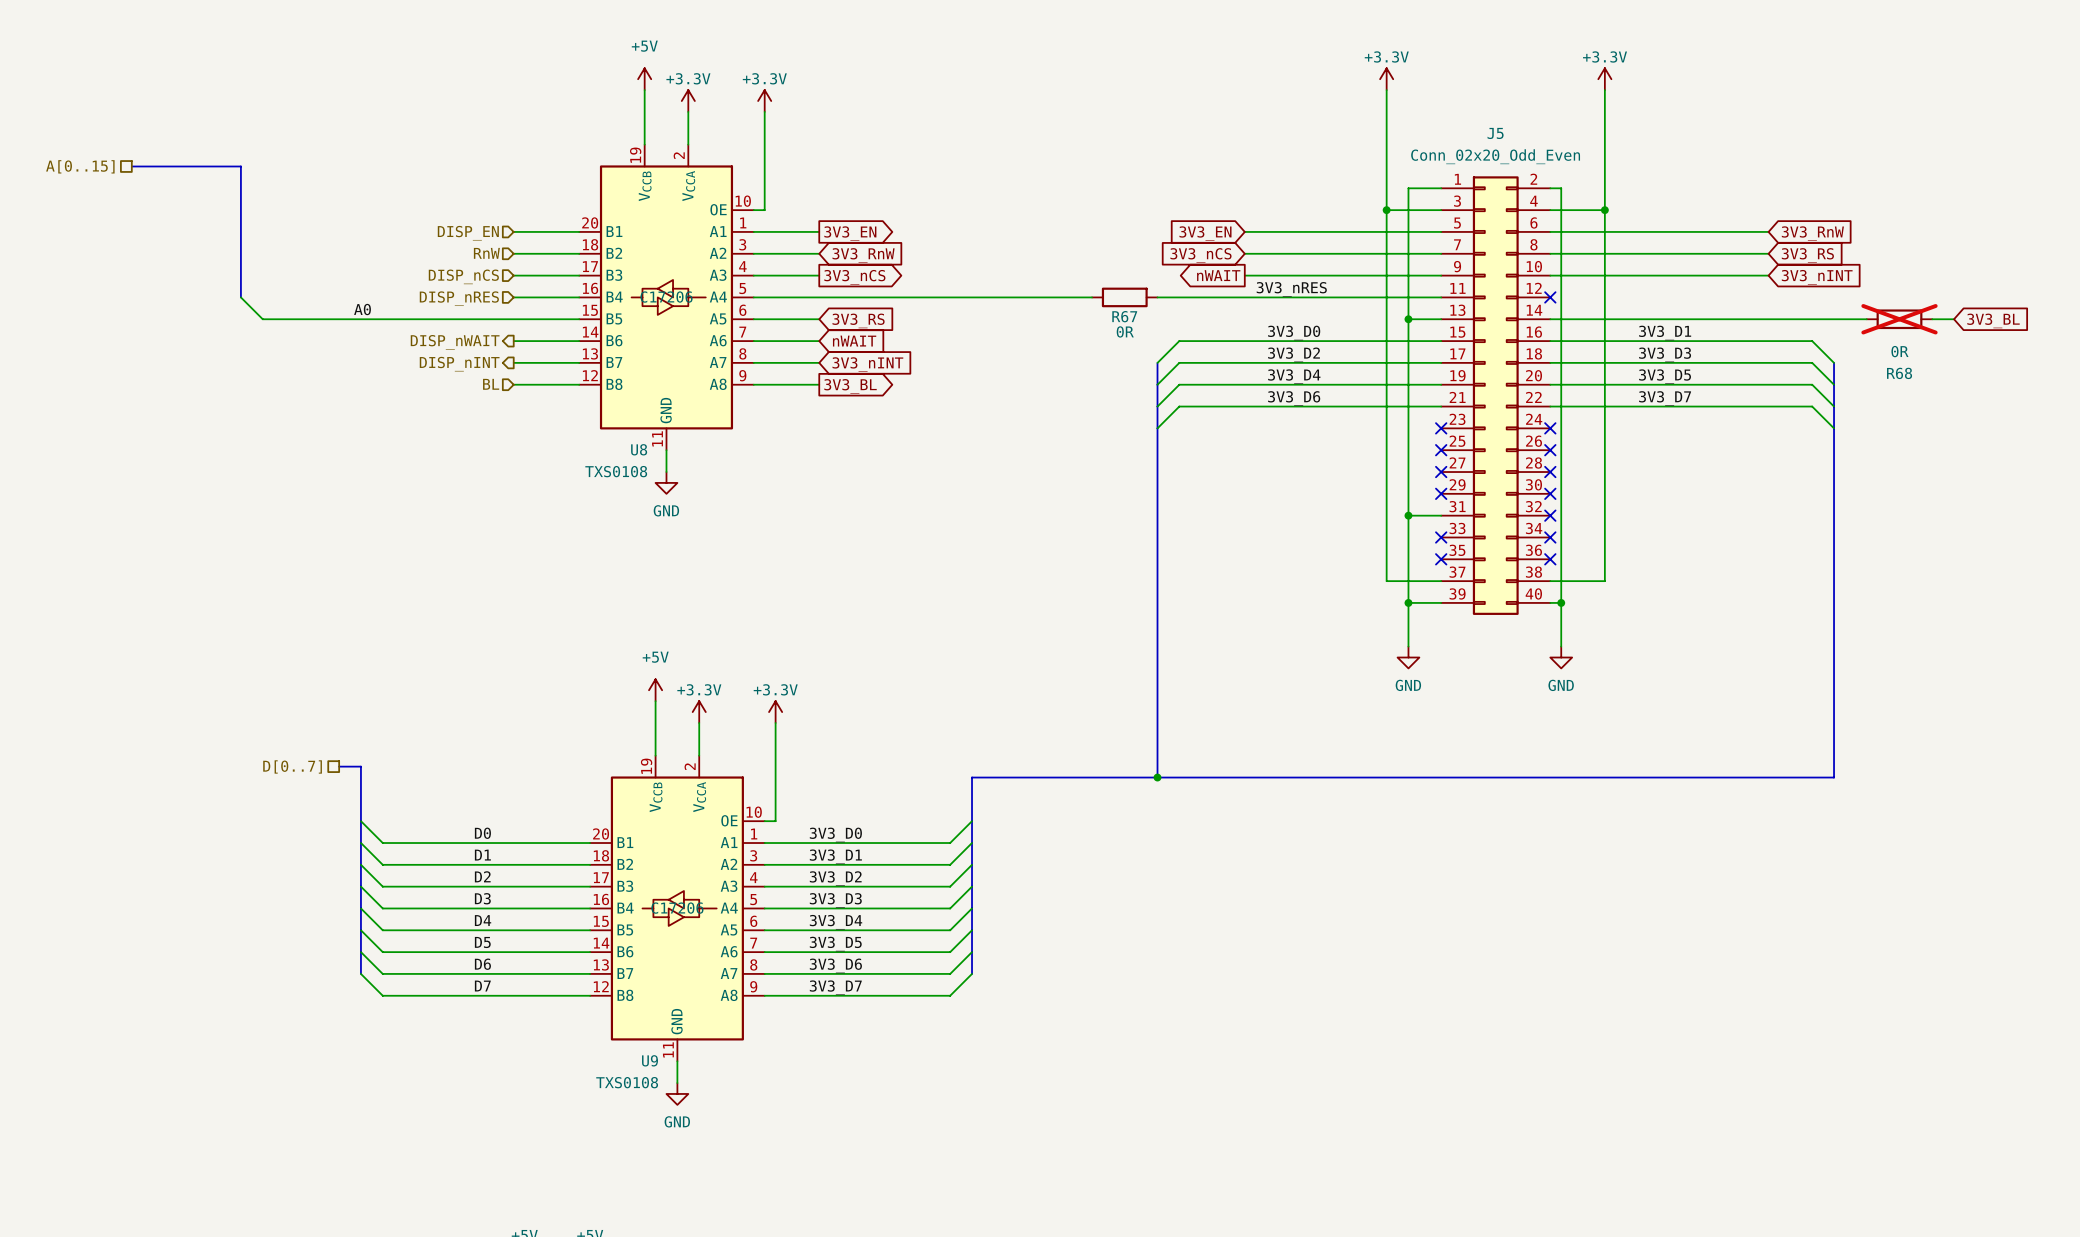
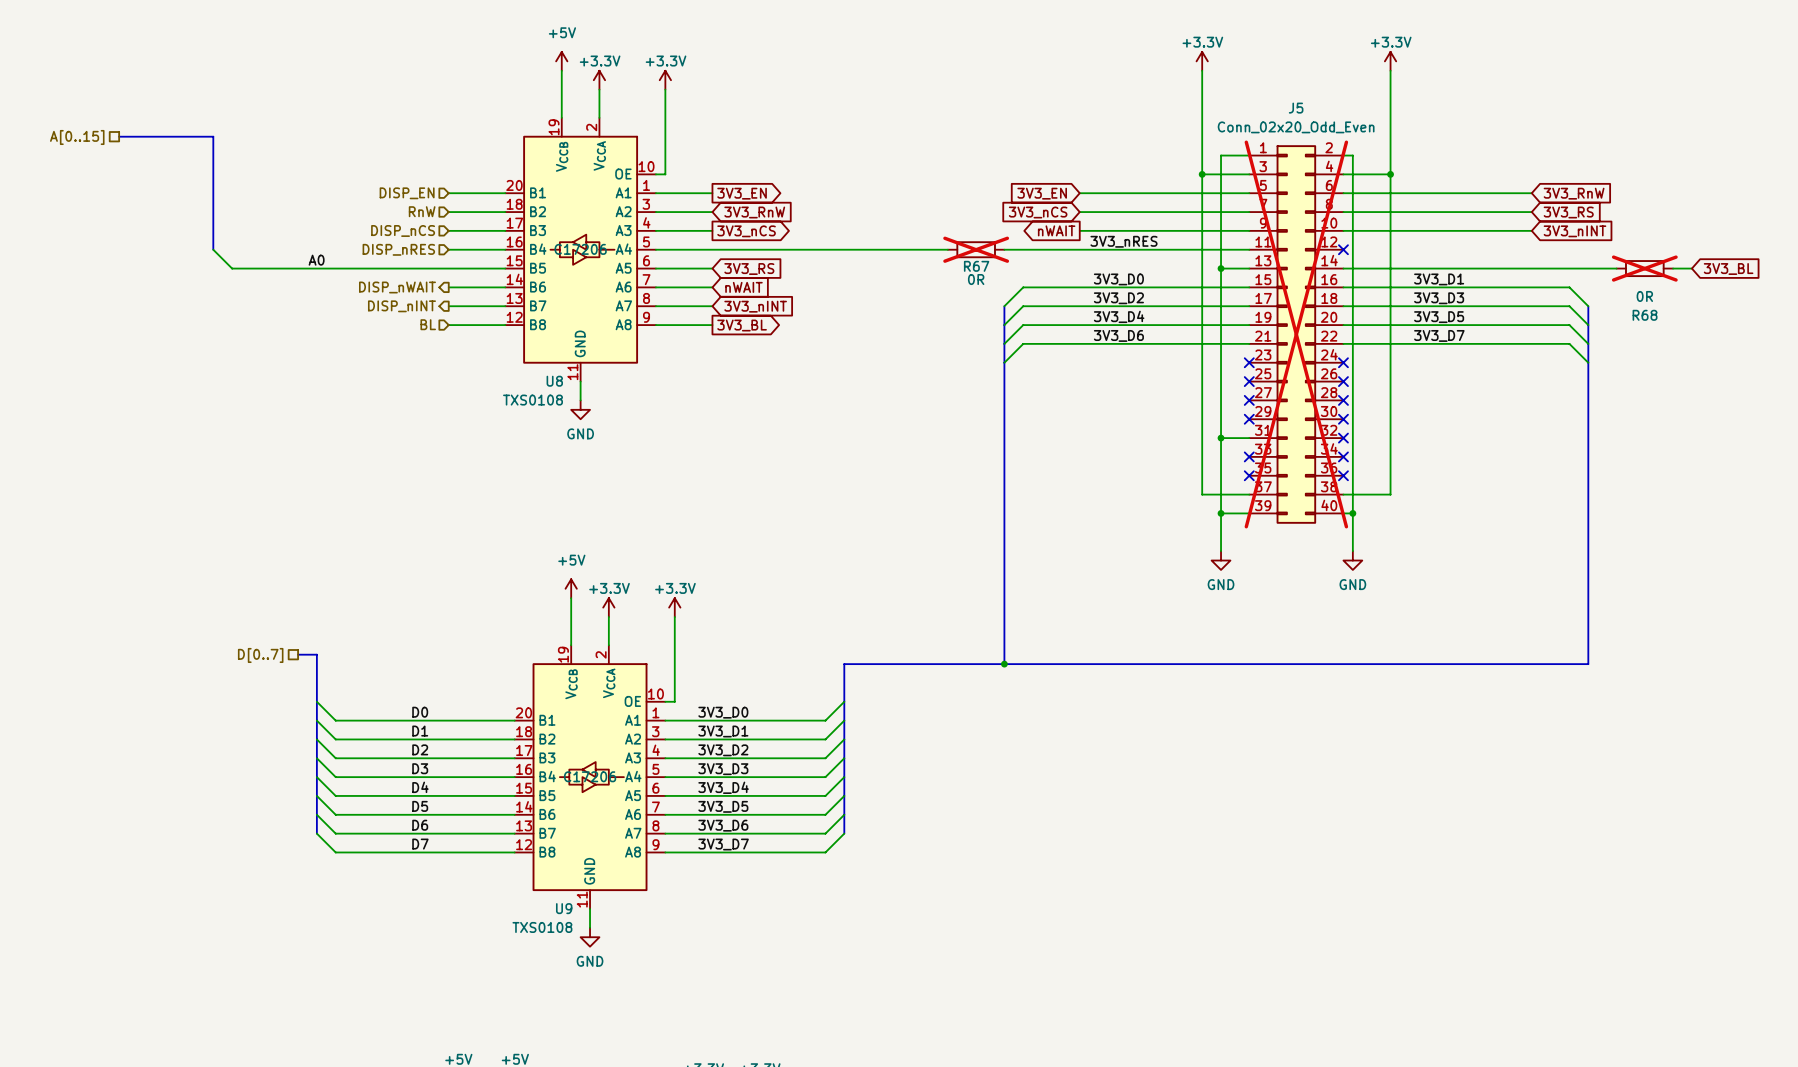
R67 do-not-place cross: none -> (976, 249)
J5 do-not-place cross: none -> (1296, 334)

